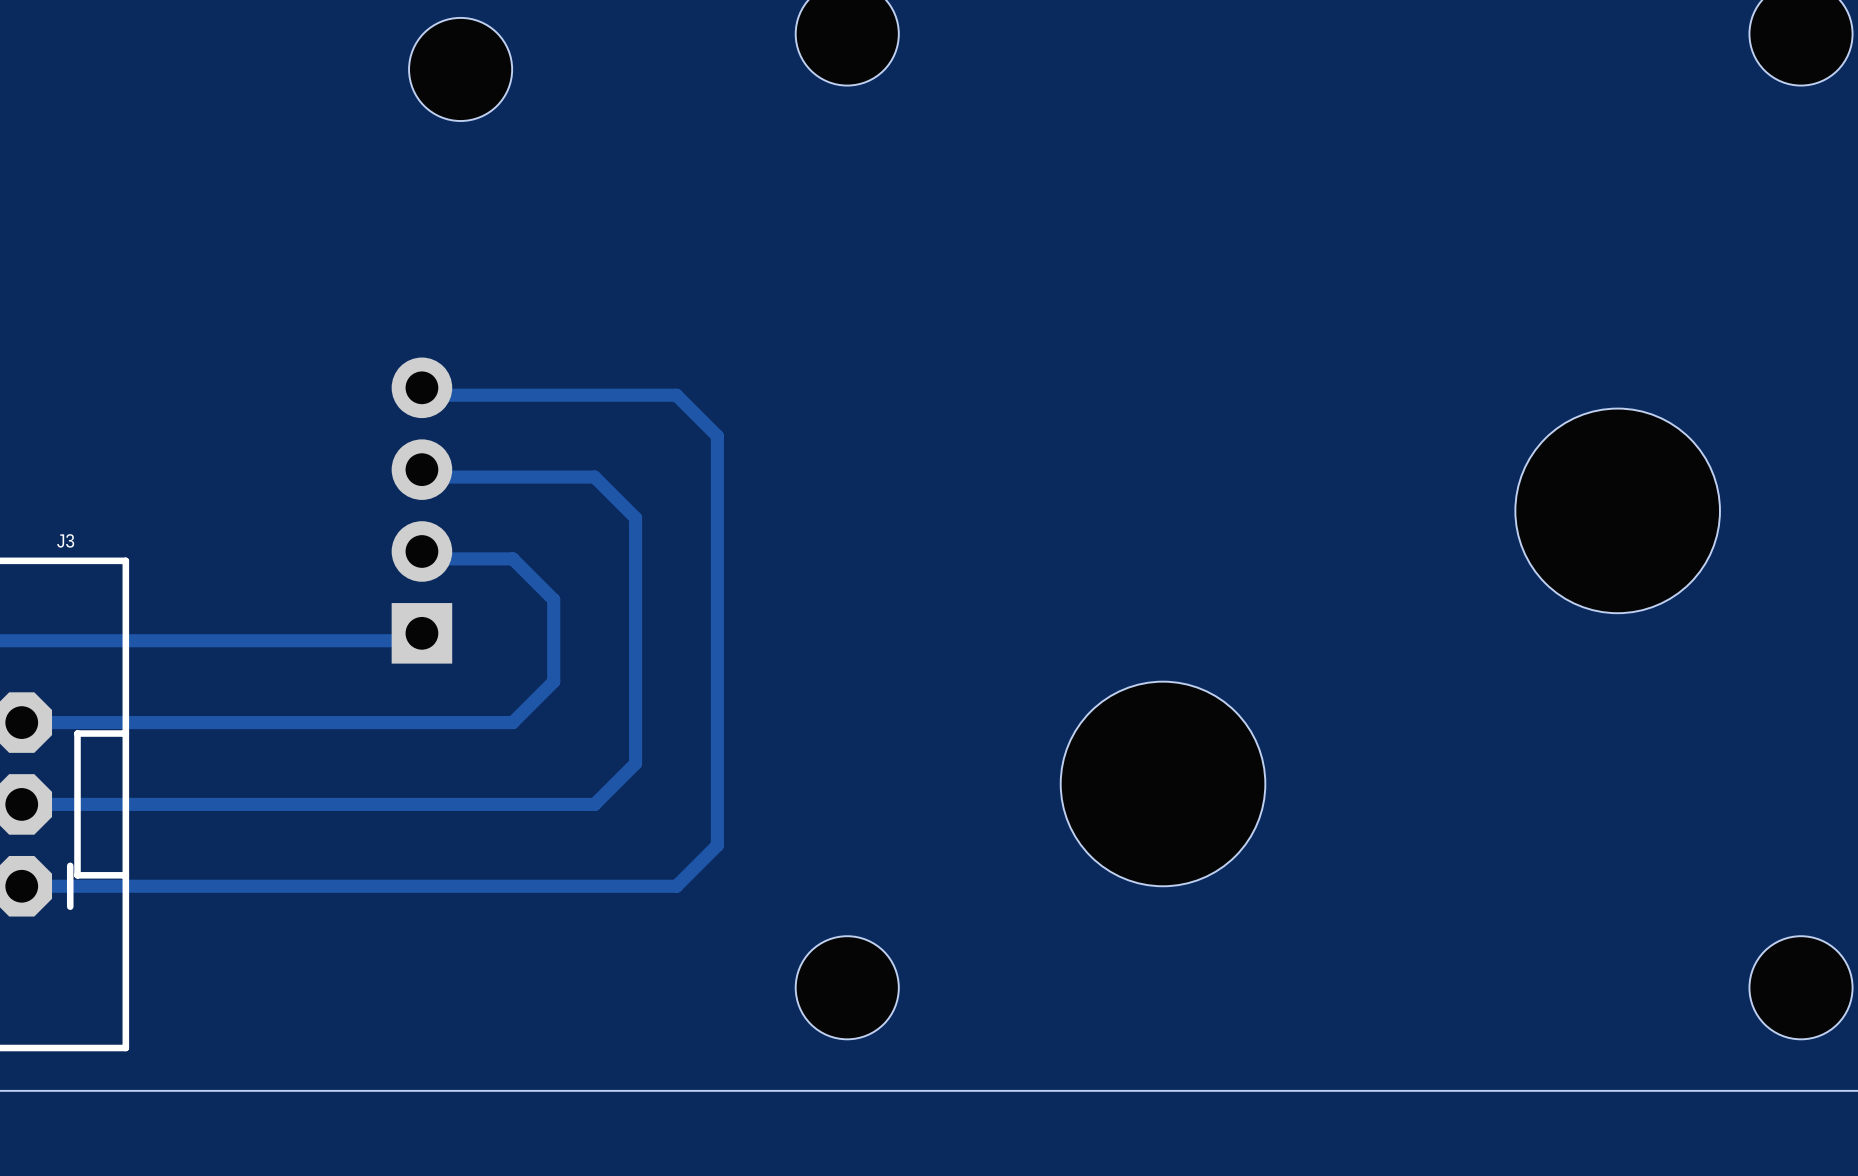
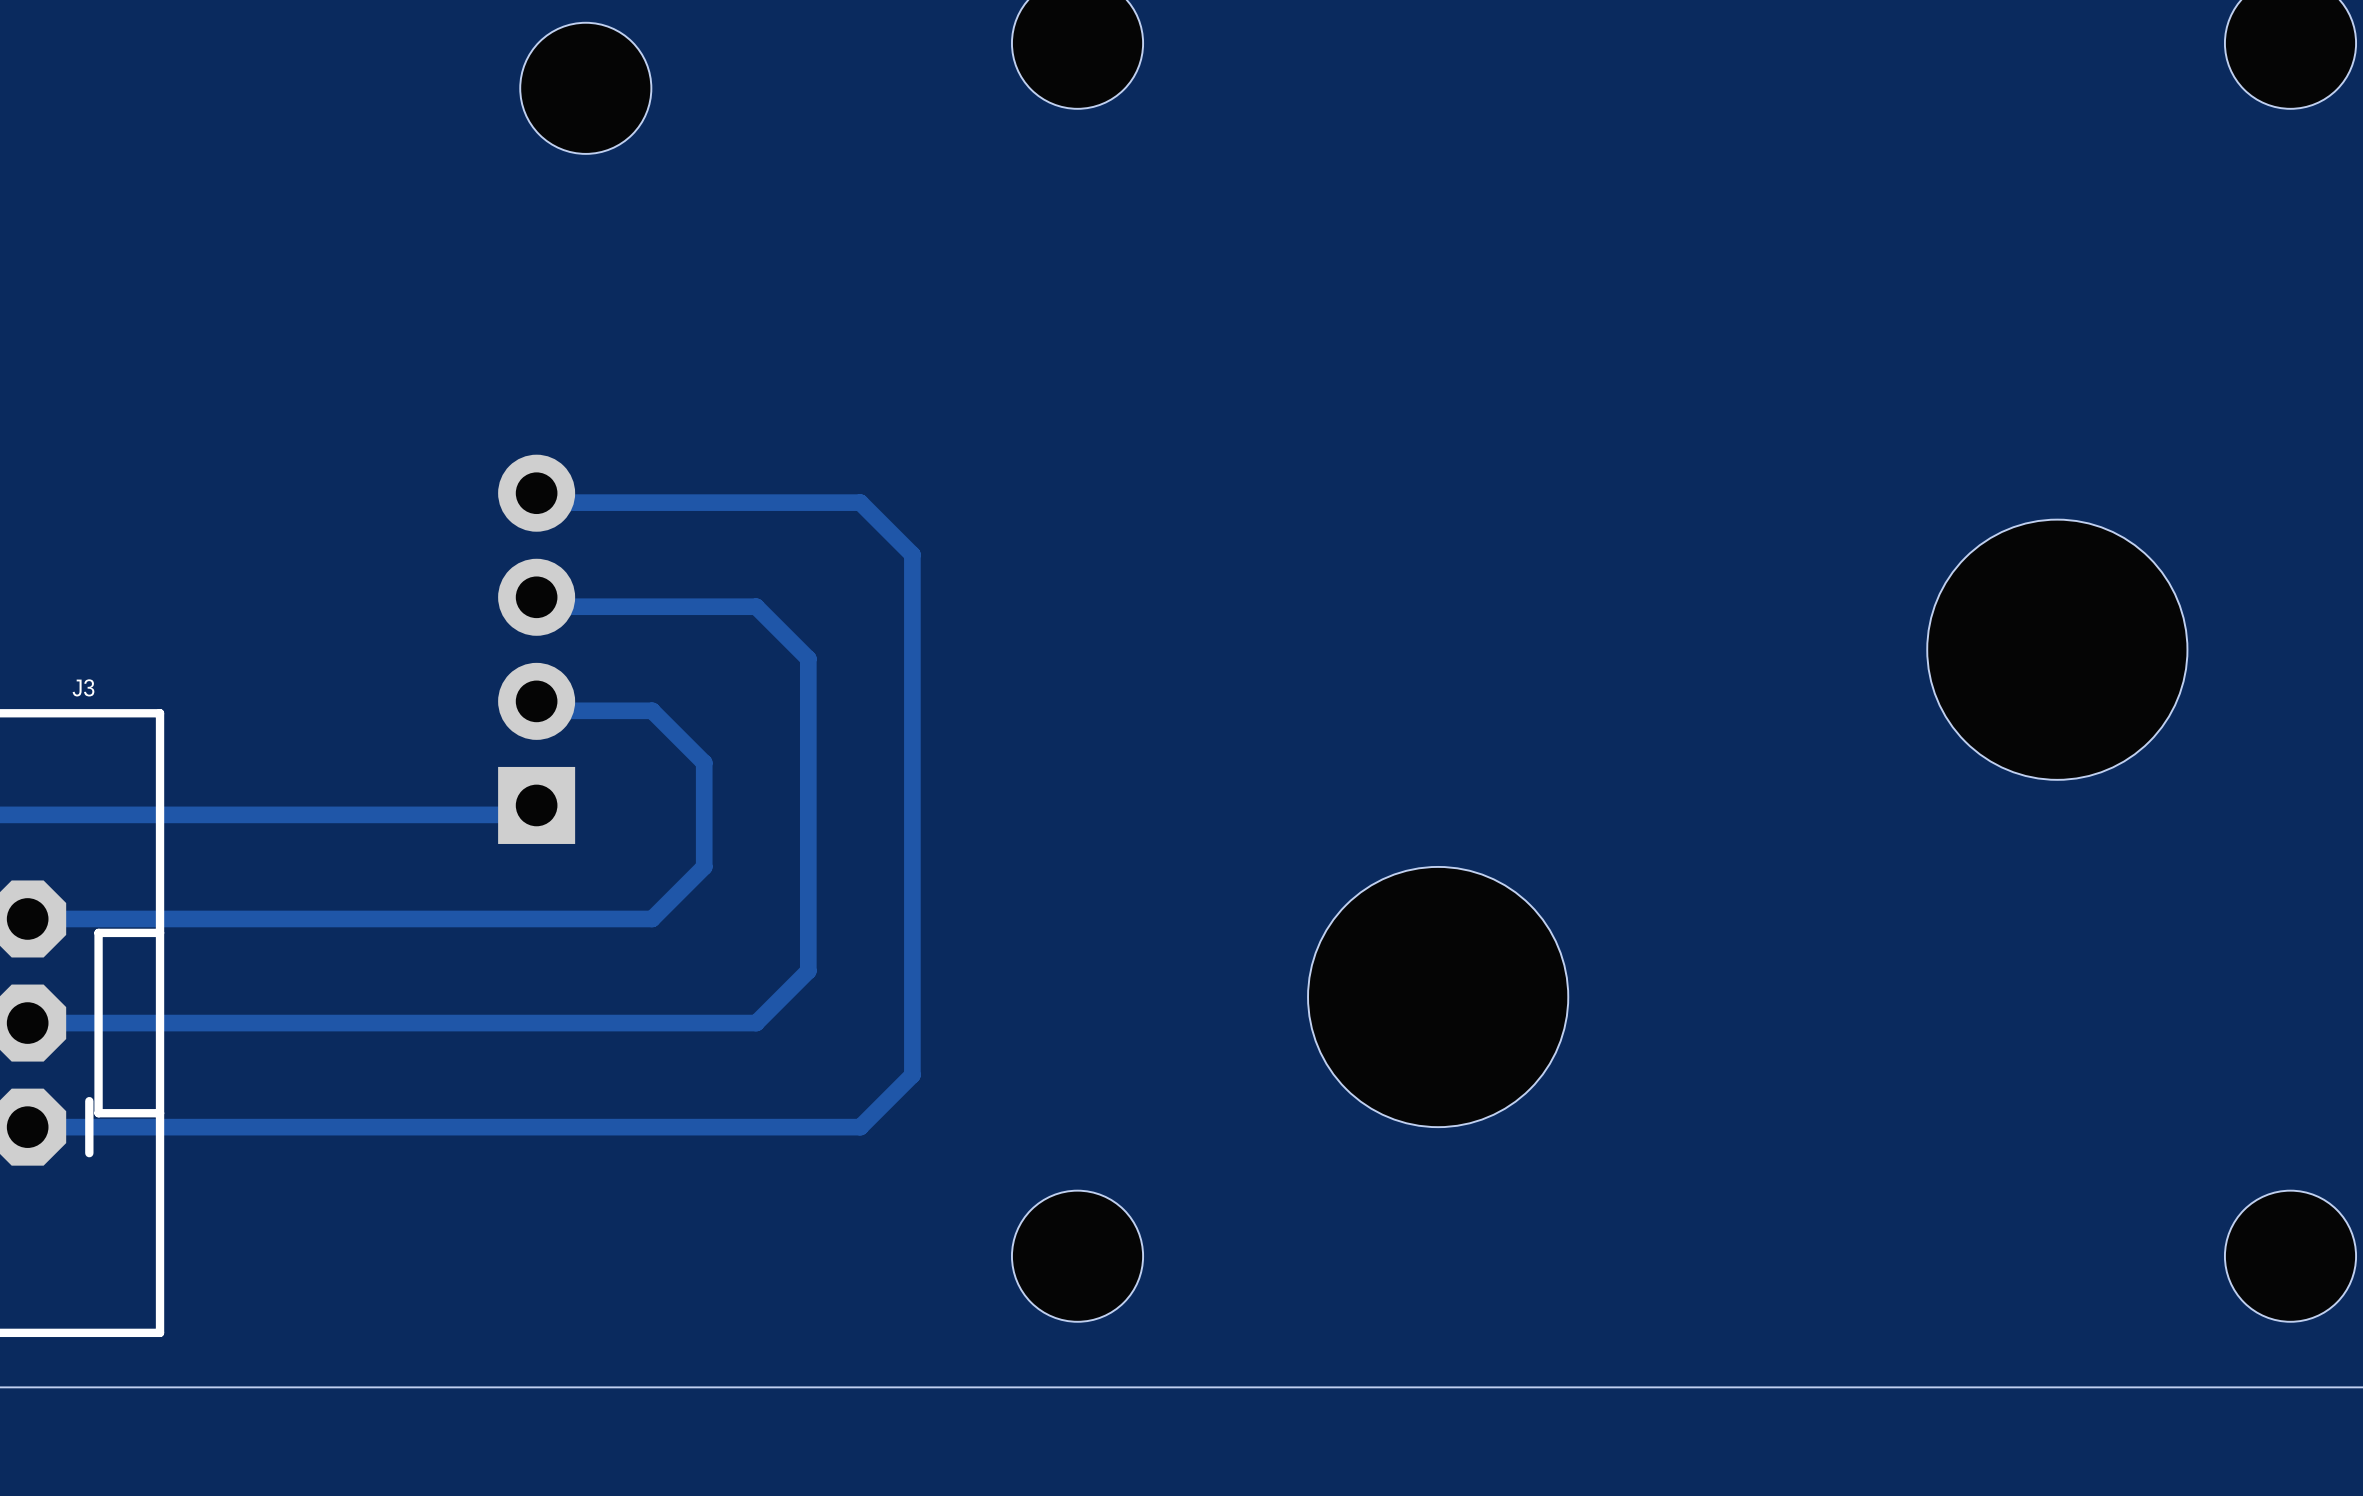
part position: (1163, 783) -> (1438, 997)

